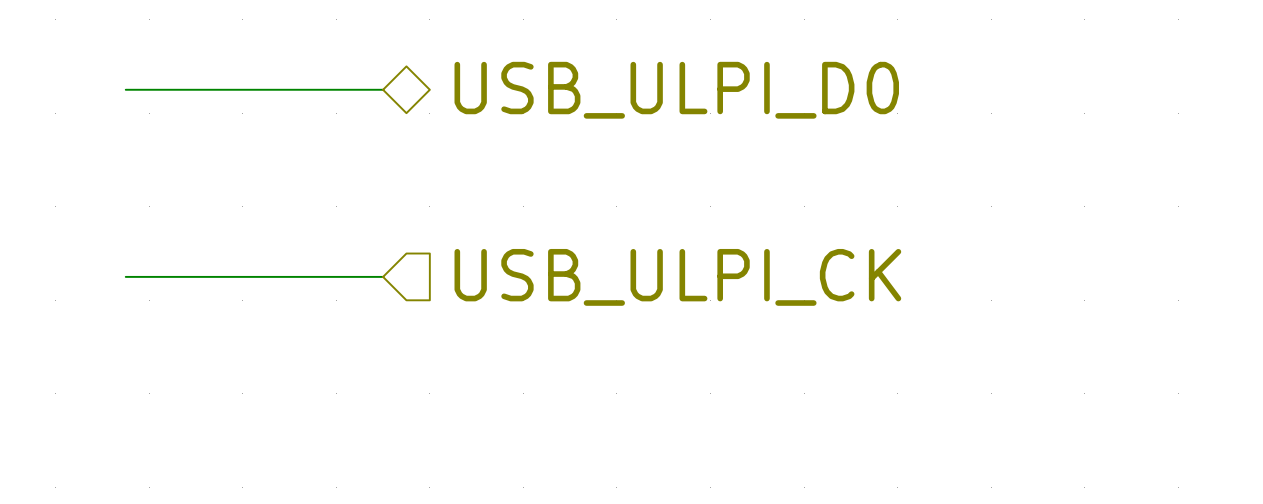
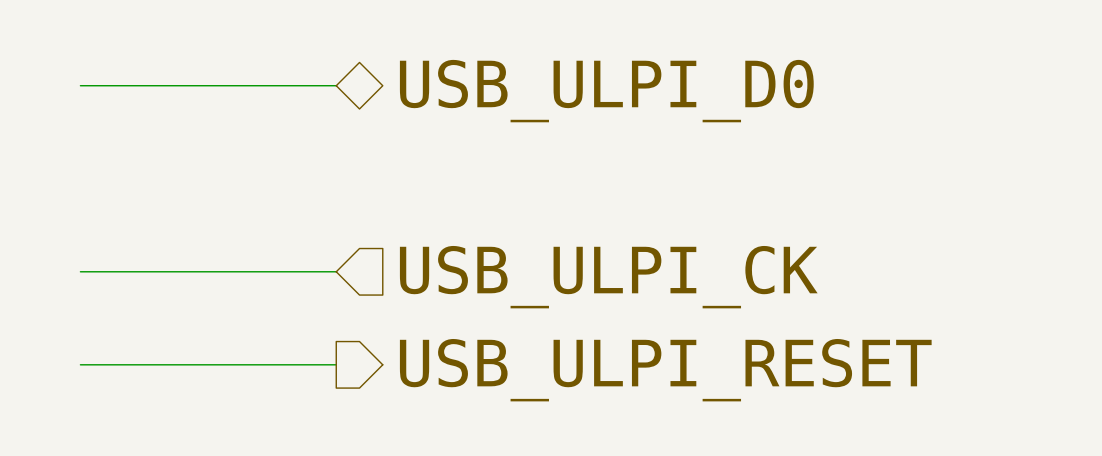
wire: none -> (80, 364) (336, 364)
hierarchical label: none -> USB_ULPI_RESET (665, 370)

